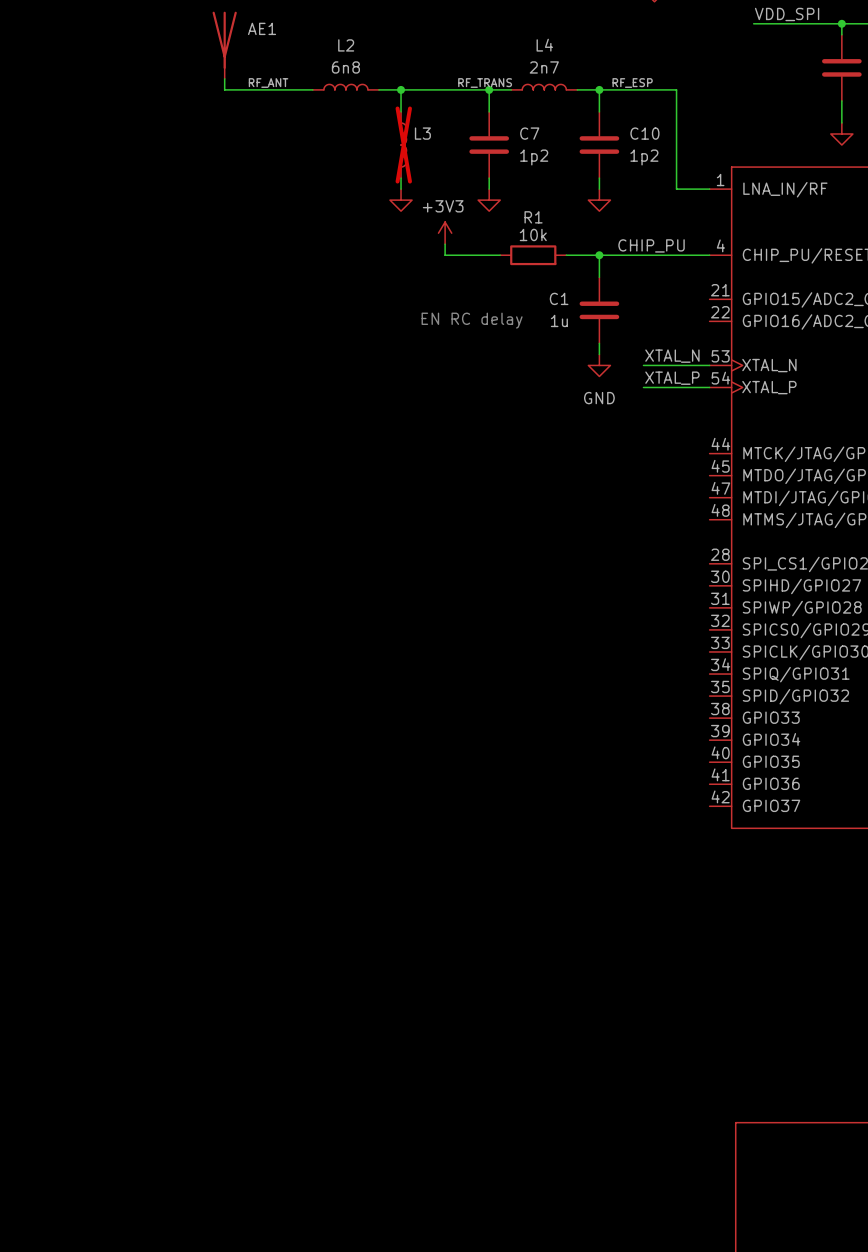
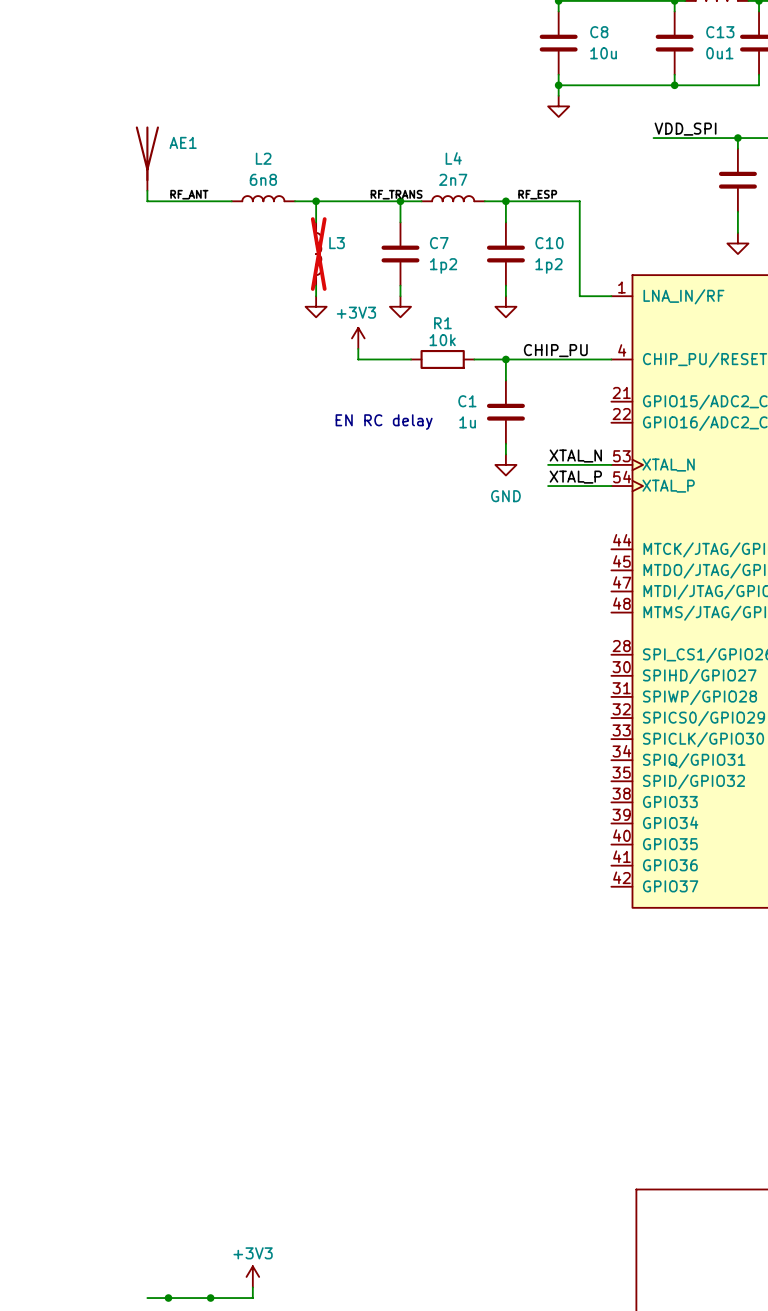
power symbol: none -> +3V3 (252, 1276)
wire: none -> (252, 1287) (252, 1298) (147, 1298)
junction: none -> (168, 1298)
junction: none -> (210, 1298)

